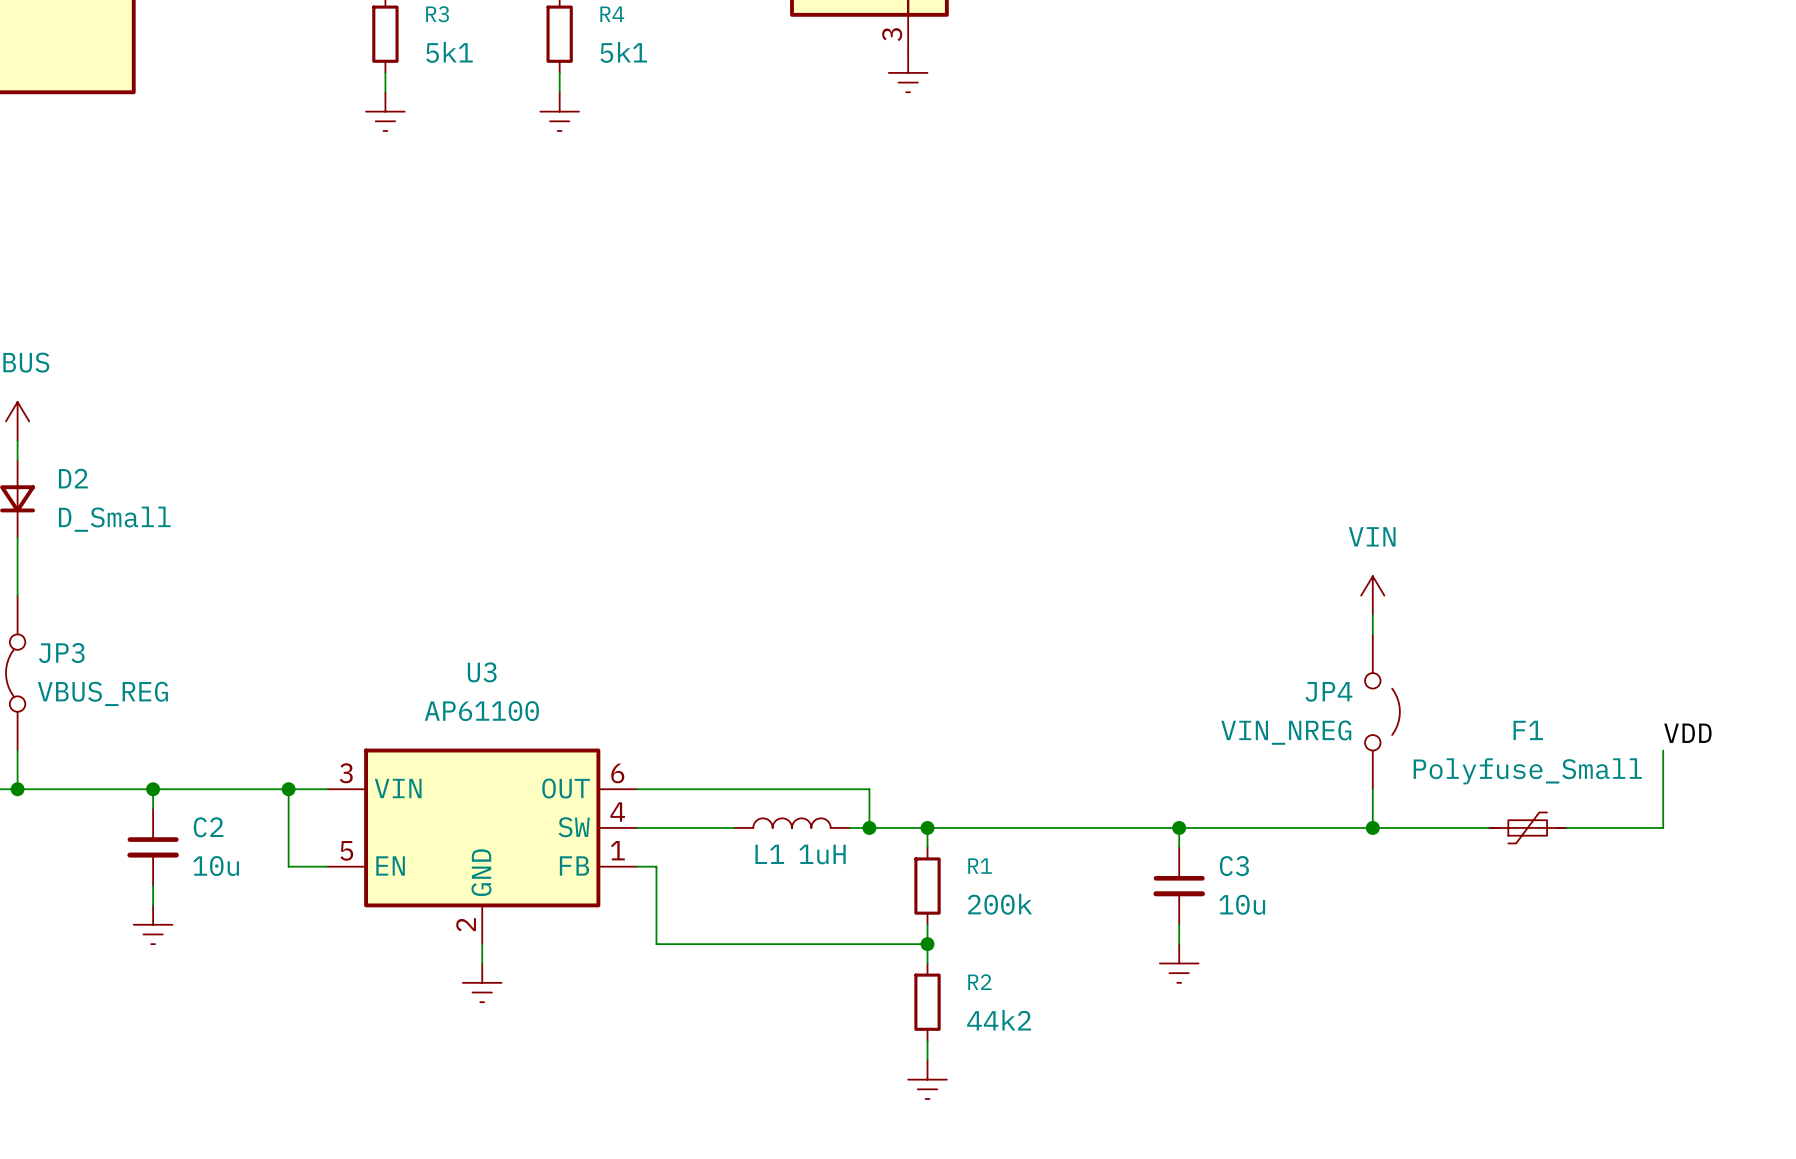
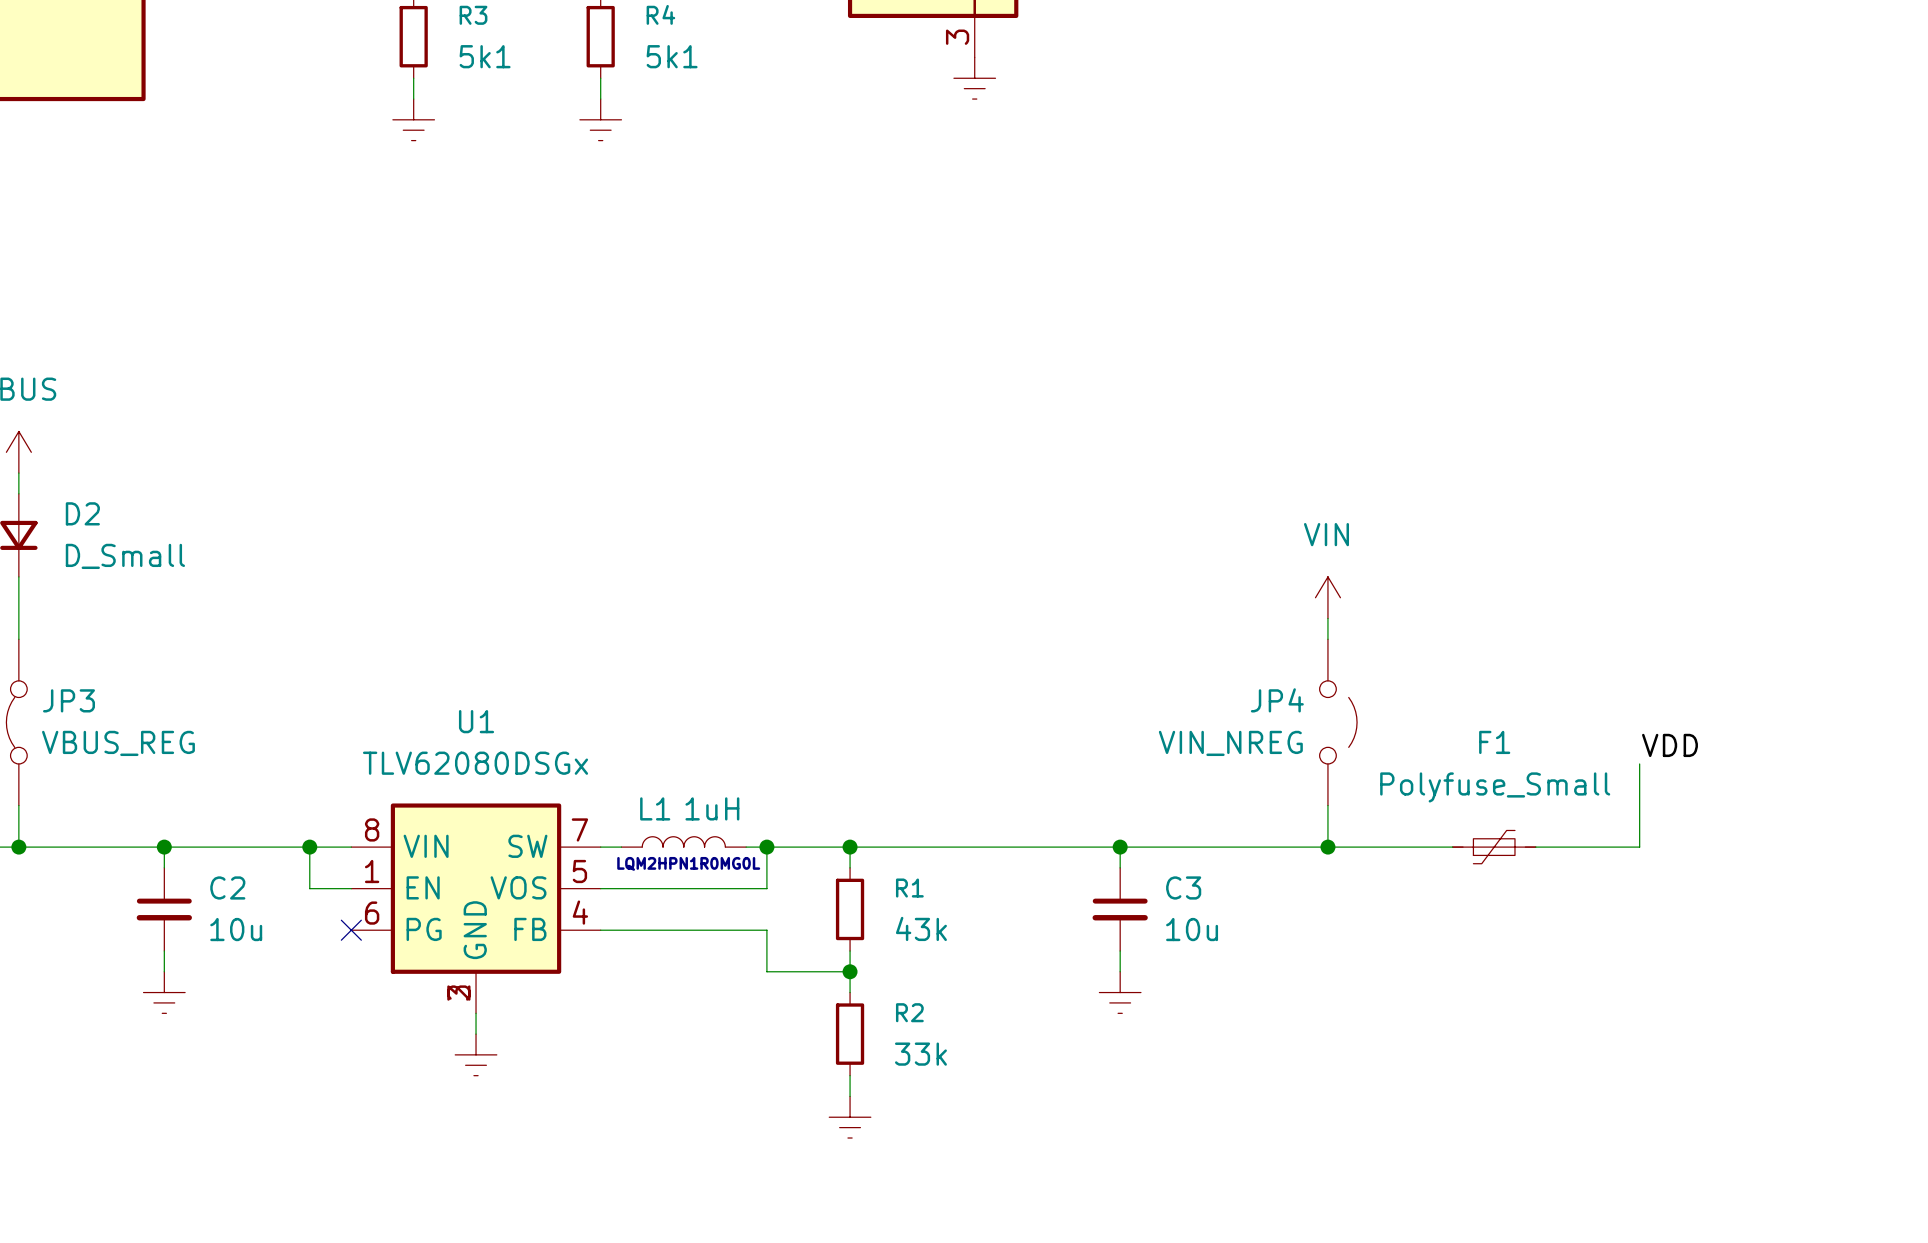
power symbol position: VIN (1372, 595) -> VIN (1327, 597)
wire: (1372, 615) (1372, 634) -> (1327, 618) (1327, 639)
JP4 position: (1382, 711) -> (1338, 722)
label position: VDD (1687, 733) -> VDD (1669, 745)
wire: (1663, 750) (1663, 827) (1566, 827) -> (1639, 763) (1639, 847) (1535, 847)
wire: (637, 789) (695, 789) -> none
junction: none -> (766, 847)
junction: none -> (850, 847)
wire: (869, 789) (869, 827) -> (933, 847) (1452, 847)
junction: none -> (1120, 847)
wire: (1372, 789) (1372, 827) -> (1327, 805) (1327, 847)
text: none -> LQM2HPN1R0MG0L (688, 863)
L1 position: (791, 823) -> (683, 841)
wire: (288, 827) (288, 866) (327, 866) -> (309, 888) (351, 888)
wire: (714, 827) (733, 827) -> (766, 888) (766, 847)
wire: (850, 827) (1488, 827) -> none
junction: (869, 827) -> none
wire: (927, 827) (927, 847) -> (850, 847) (850, 867)
junction: (927, 827) -> none
wire: (1179, 827) (1179, 847) -> (1120, 847) (1120, 867)
junction position: (1179, 827) -> (1327, 847)
junction: (1372, 827) -> none
F1 position: (1527, 827) -> (1494, 847)
U1: none -> TLV62080DSGx (476, 908)
U3: AP61100 (482, 846) -> none
L1 name position: L1 (769, 854) -> L1 (655, 808)
L1 value position: 1uH (822, 854) -> 1uH (712, 808)
no-connect mark: none -> (351, 930)
wire: (656, 866) (656, 944) (927, 944) -> (704, 930) (766, 930) (766, 971) (850, 971)
R1 position: (927, 886) -> (850, 909)
C3 position: (1179, 886) -> (1120, 909)
R1 value: 200k (1000, 904) -> 43k (921, 928)
junction: none -> (850, 971)
wire: (927, 924) (927, 963) -> (850, 950) (850, 992)
power symbol: none -> (1120, 992)
wire: (1179, 924) (1179, 944) -> (1120, 950) (1120, 971)
wire: (482, 944) (482, 963) -> (476, 1013) (476, 1034)
junction: (927, 944) -> none
power symbol: (1179, 963) -> none
power symbol position: (482, 982) -> (476, 1054)
R2 position: (927, 1002) -> (850, 1034)
R2 value: 44k2 (999, 1020) -> 33k (920, 1054)
power symbol: none -> (850, 1117)
wire: (927, 1040) (927, 1060) -> (850, 1075) (850, 1096)
power symbol: (927, 1079) -> none

